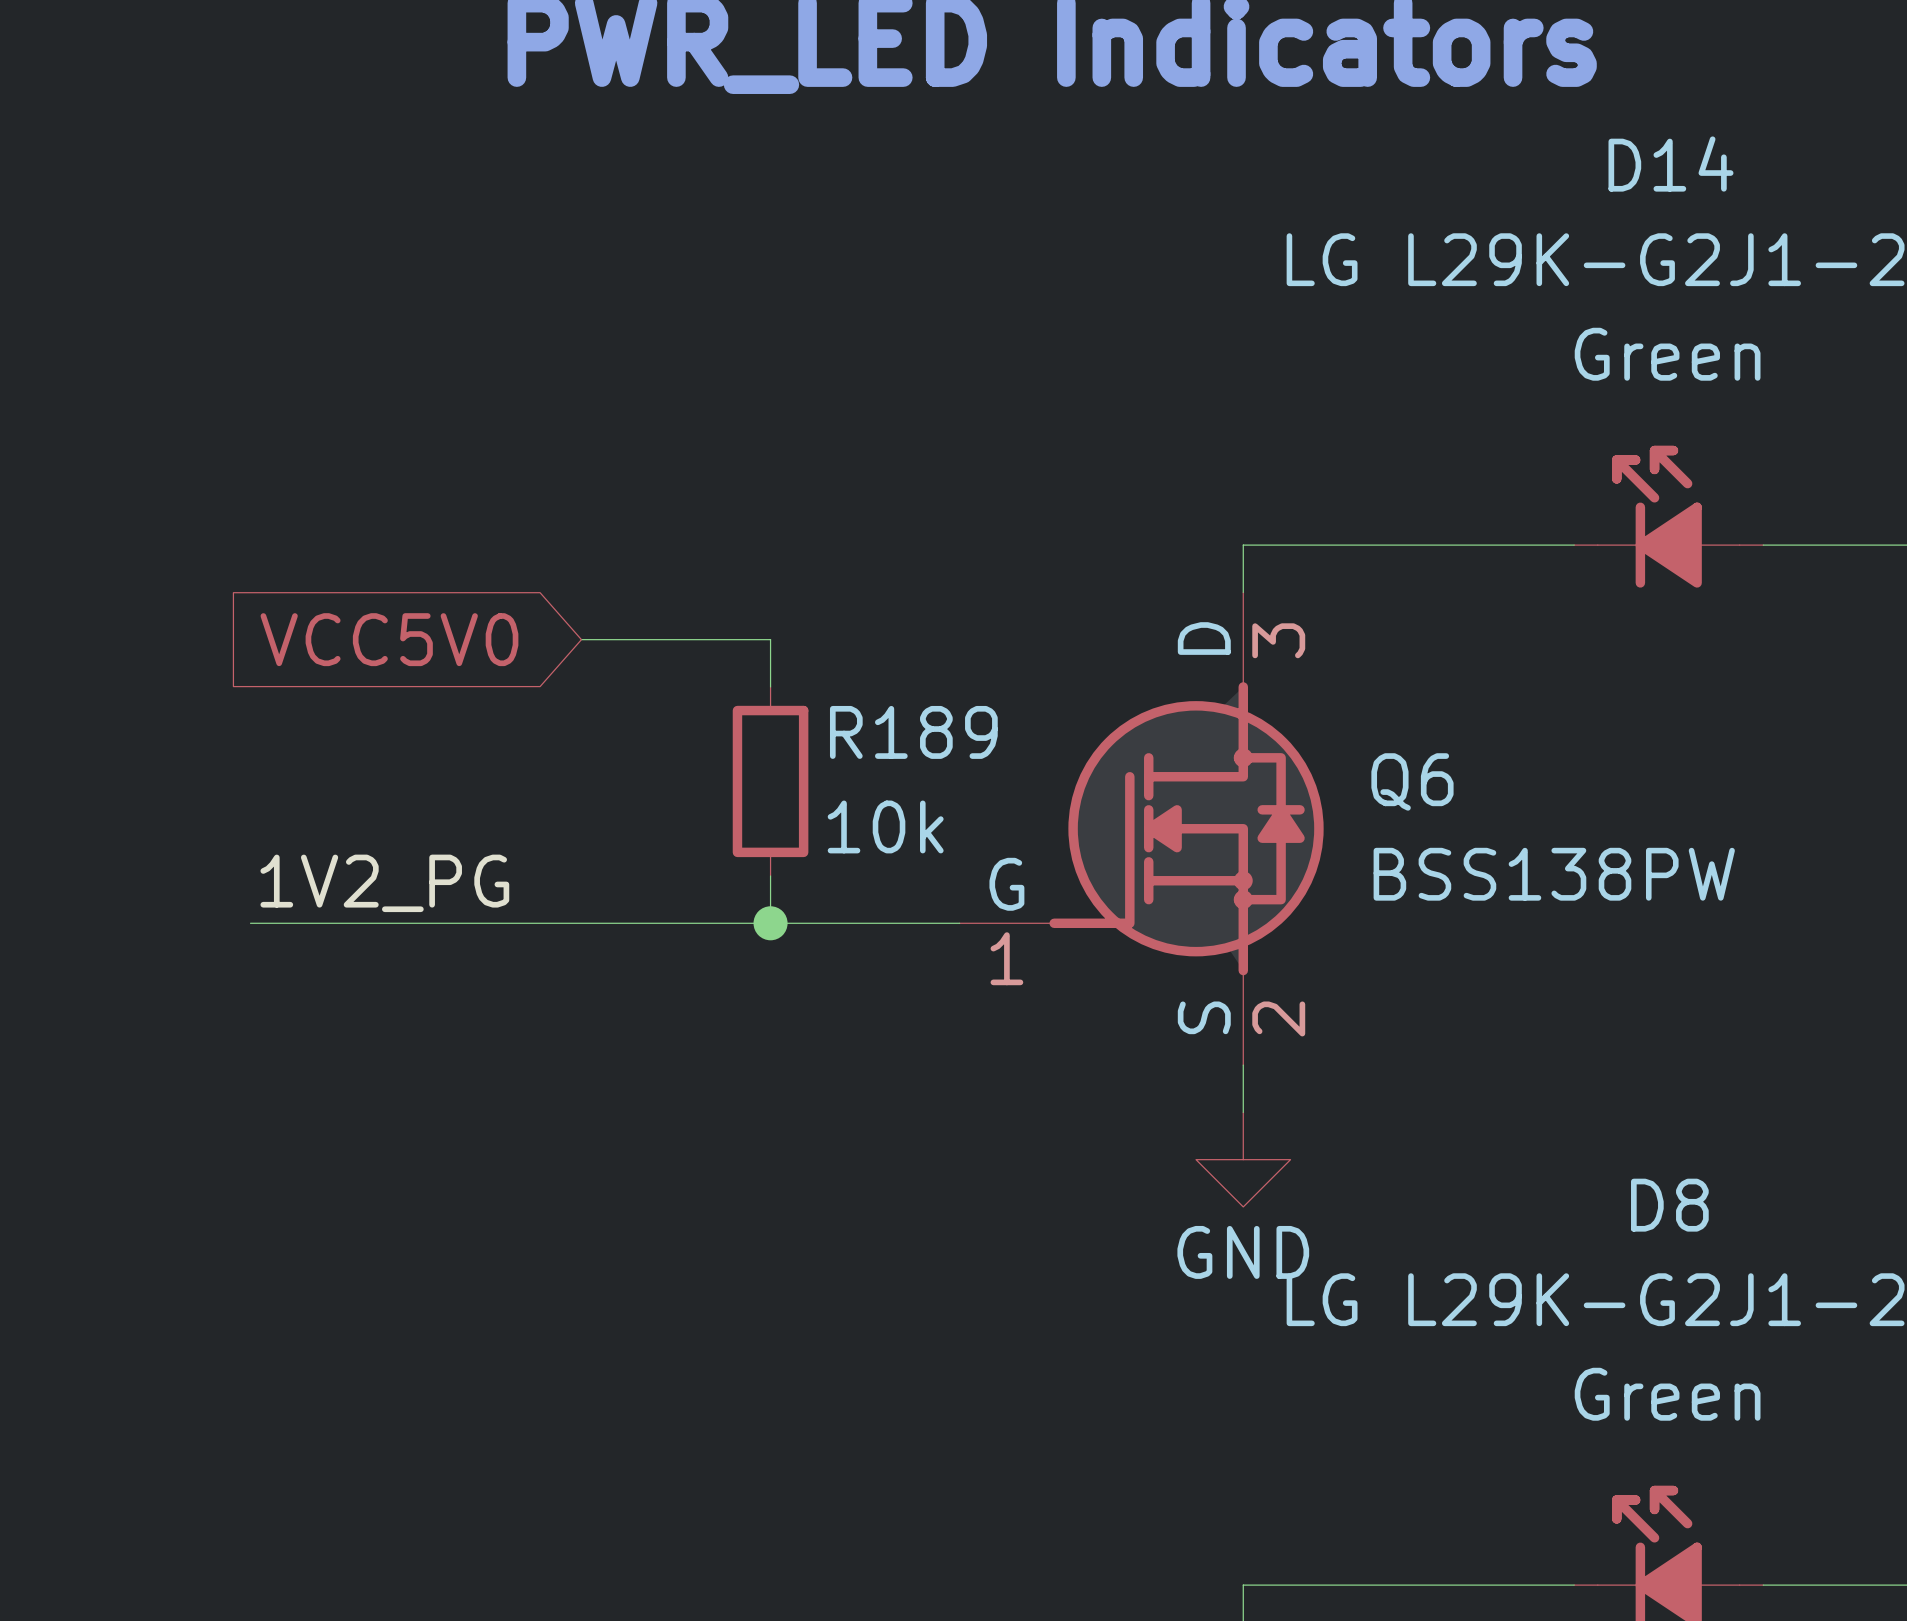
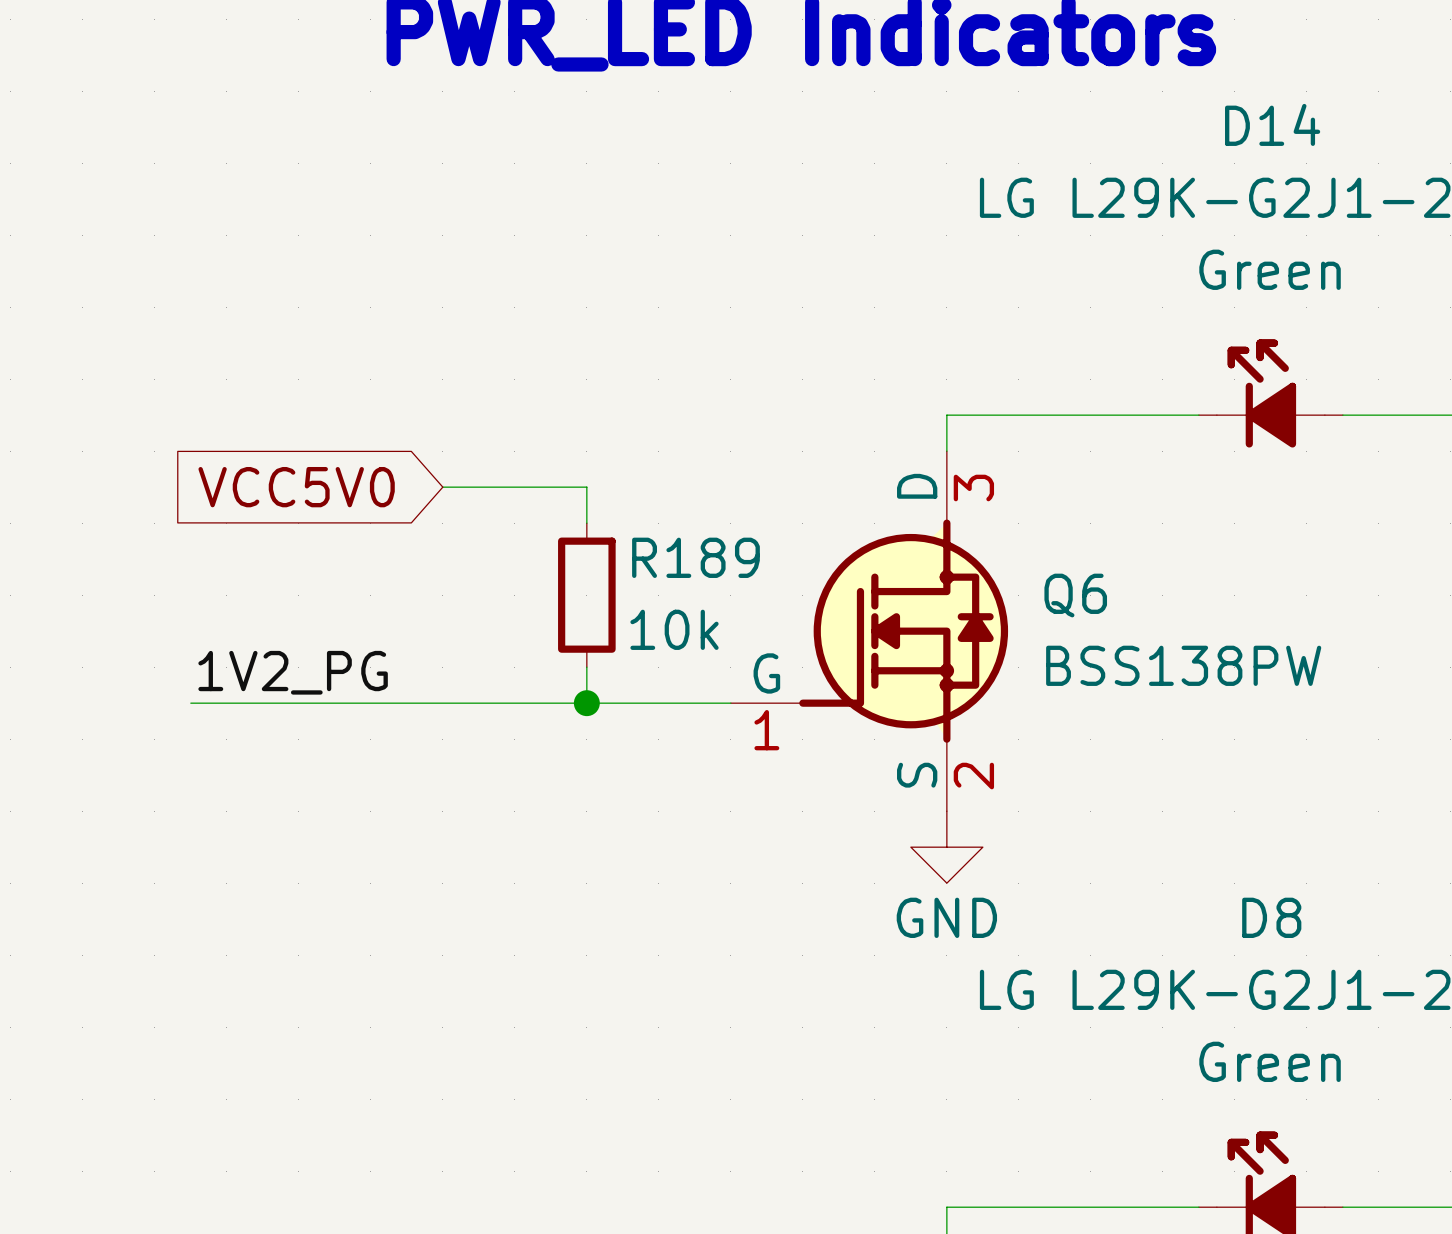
power symbol position: GND (1243, 1159) -> GND (946, 847)

